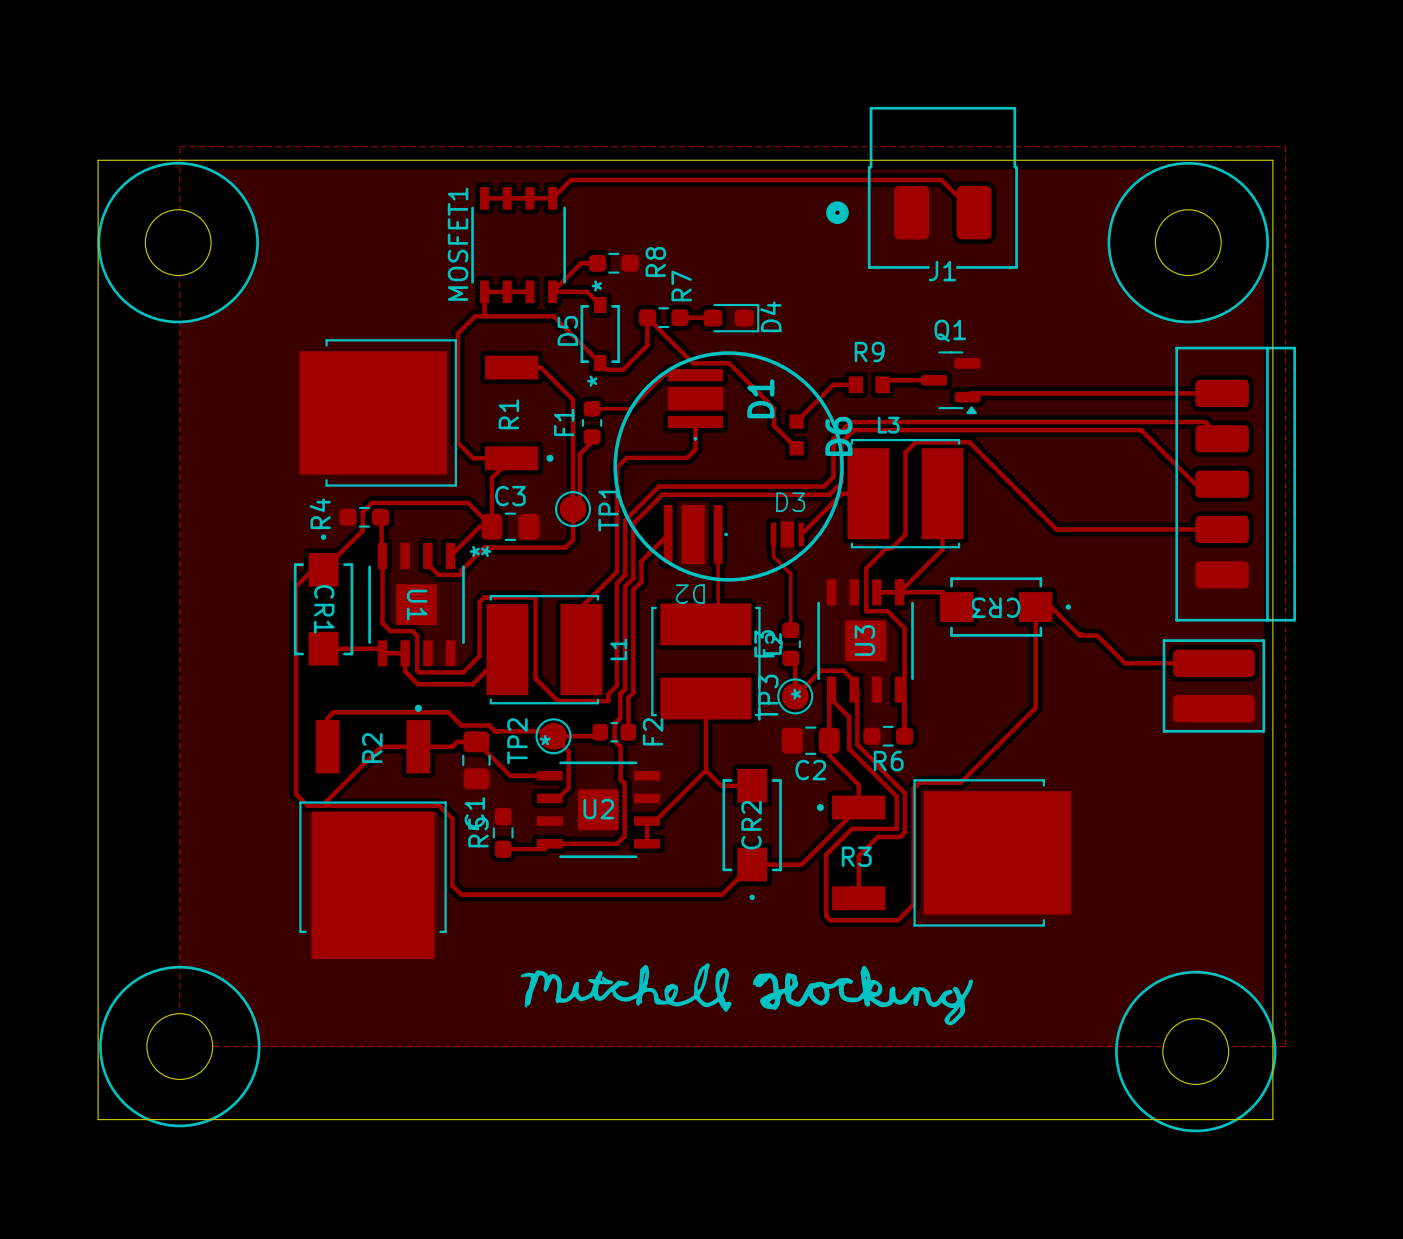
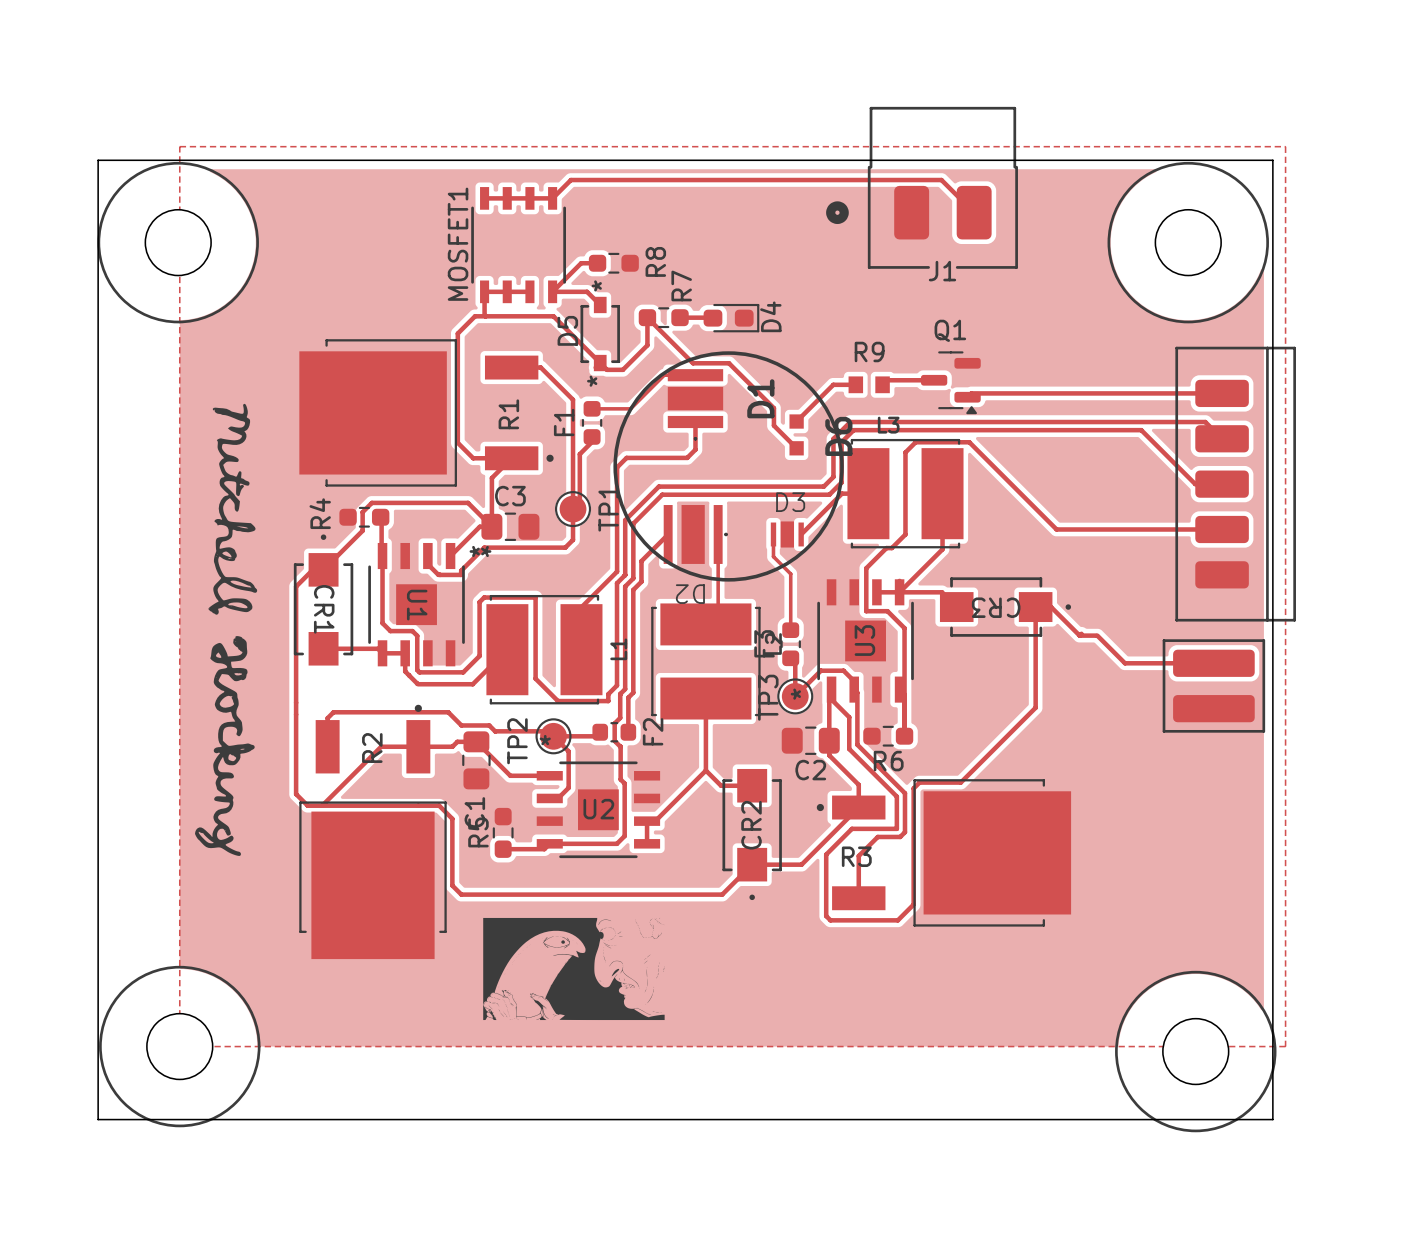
drawing: none -> [195, 403, 258, 856]
drawing: none -> [483, 917, 665, 1021]
drawing: [520, 963, 973, 1026] -> none

